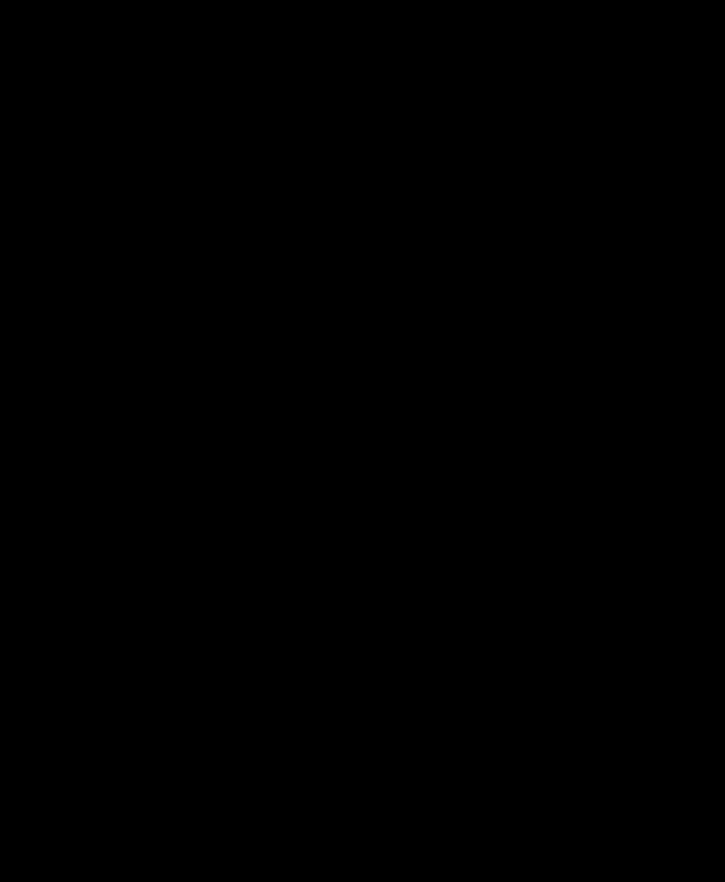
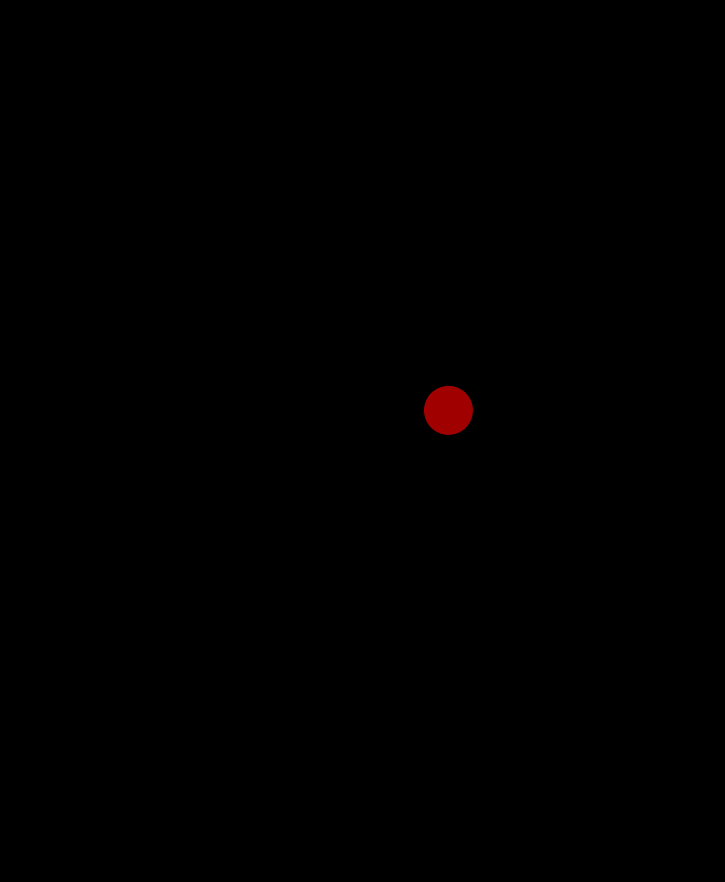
part: none -> (448, 410)

